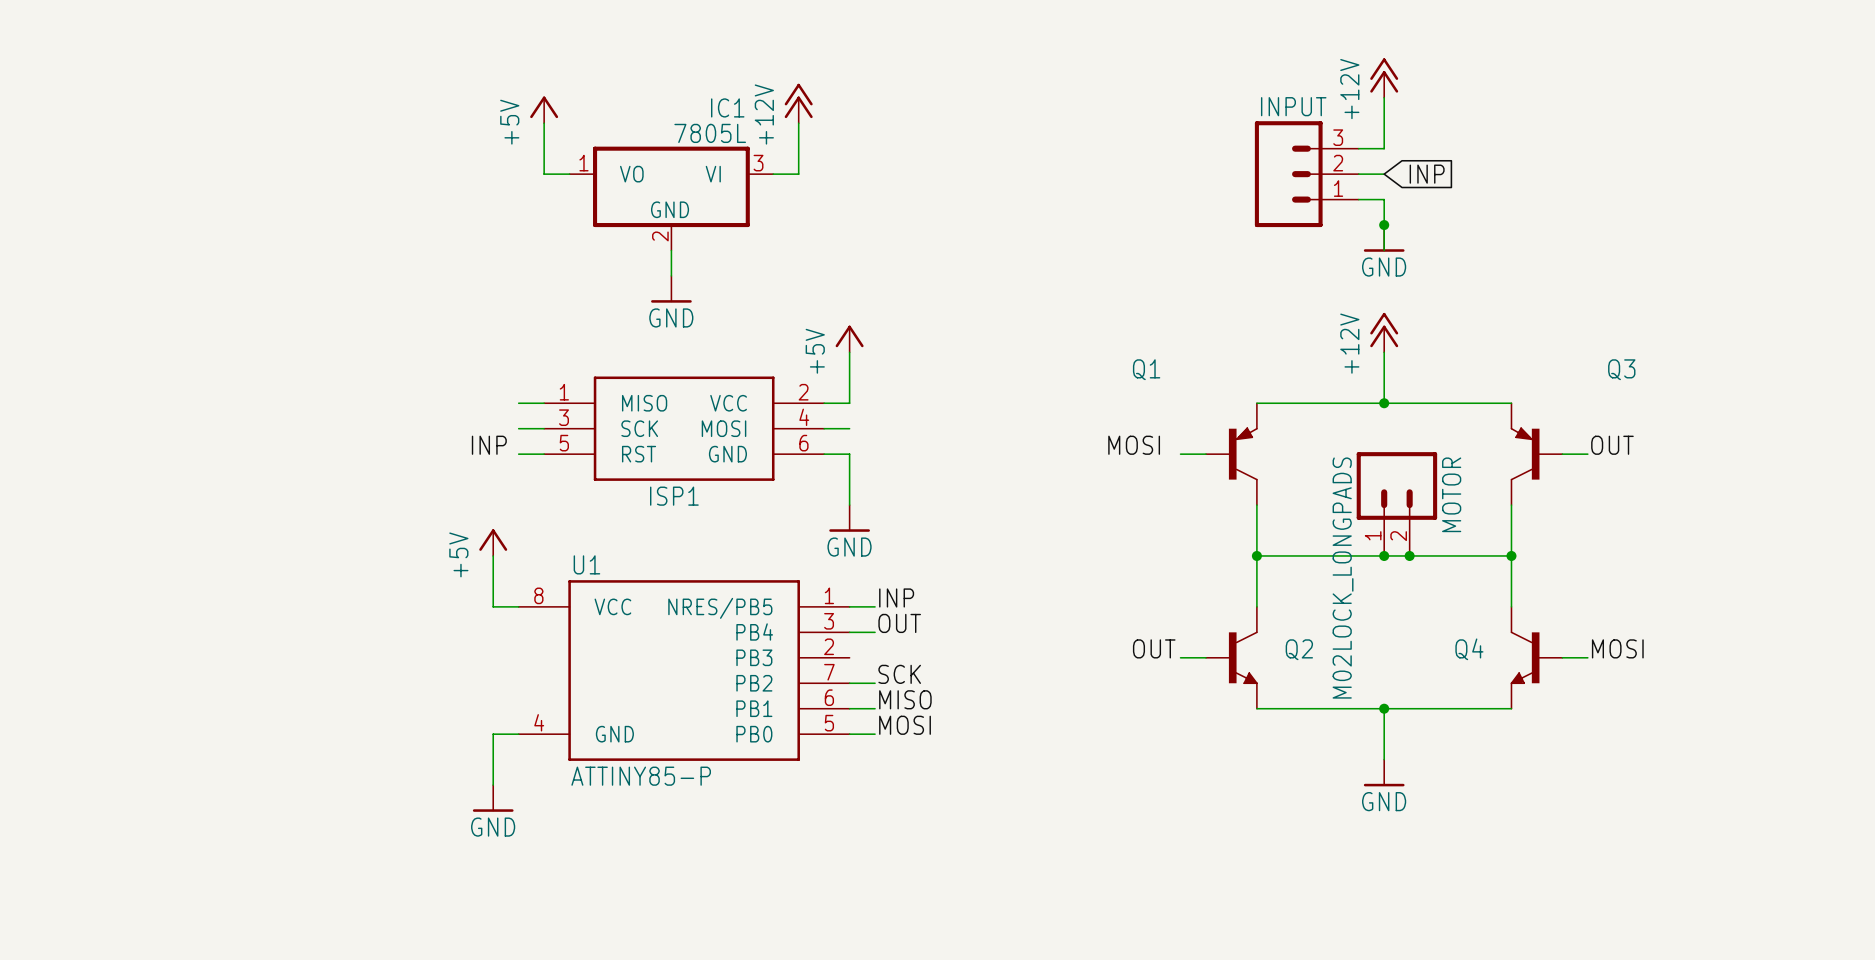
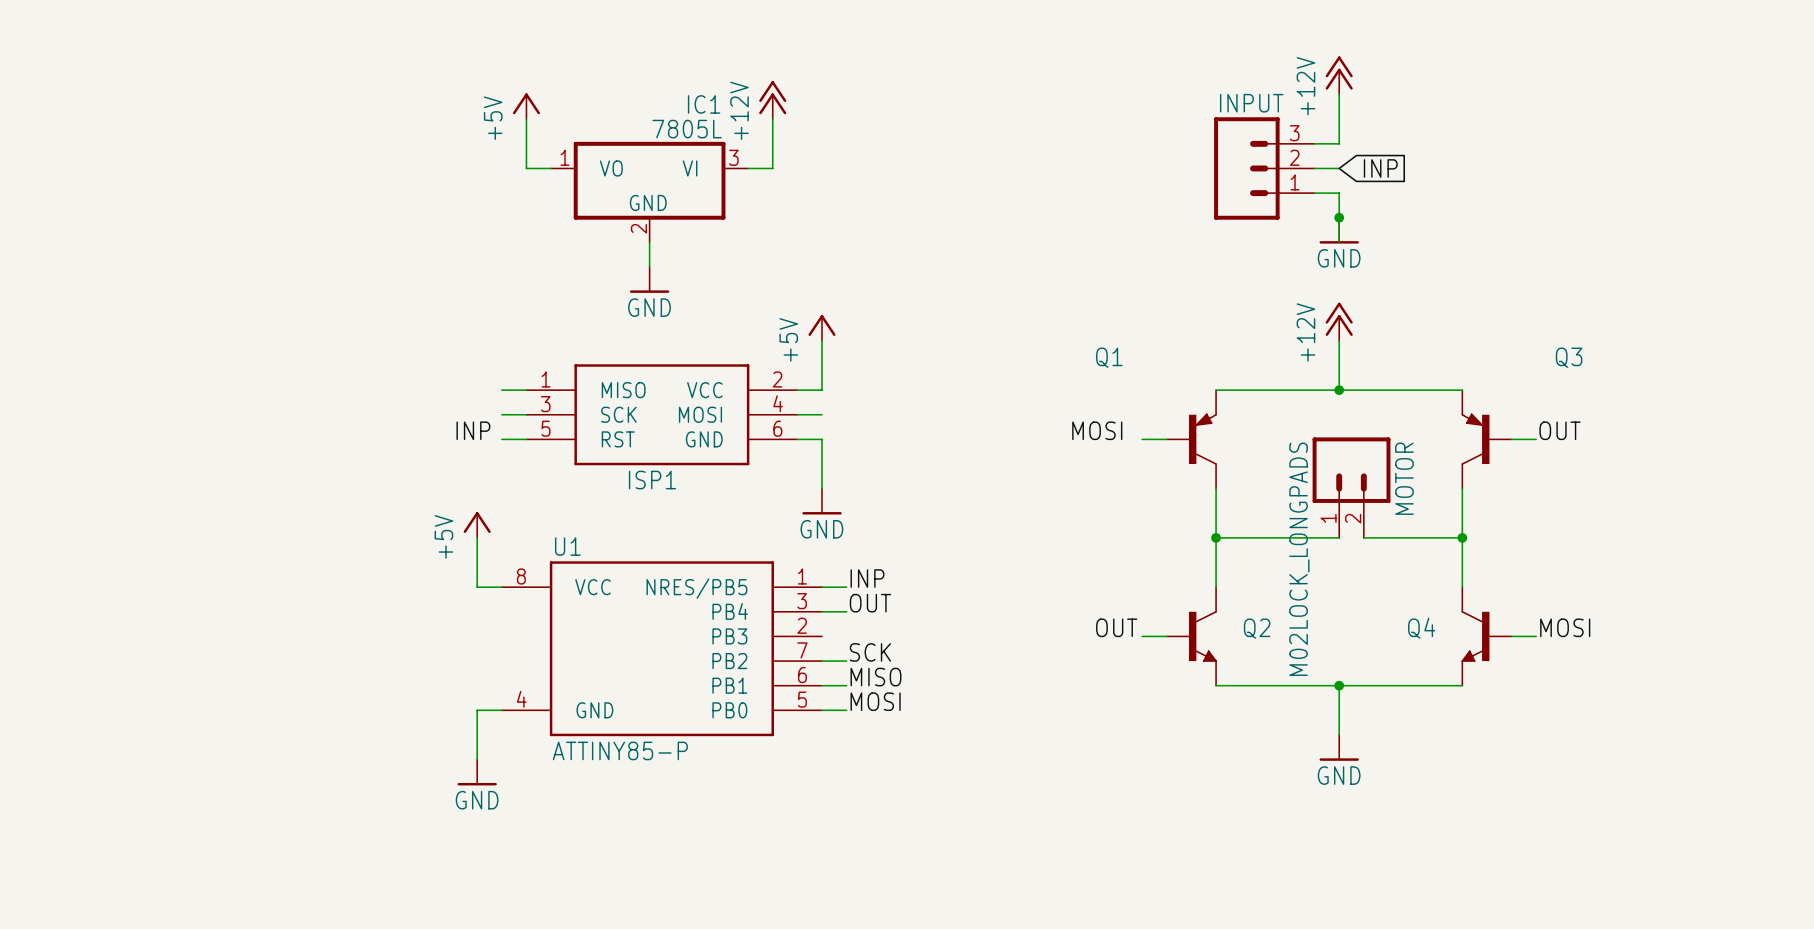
wire: (1384, 555) (1409, 555) -> none
junction: (1384, 555) -> none
junction: (1409, 555) -> none

